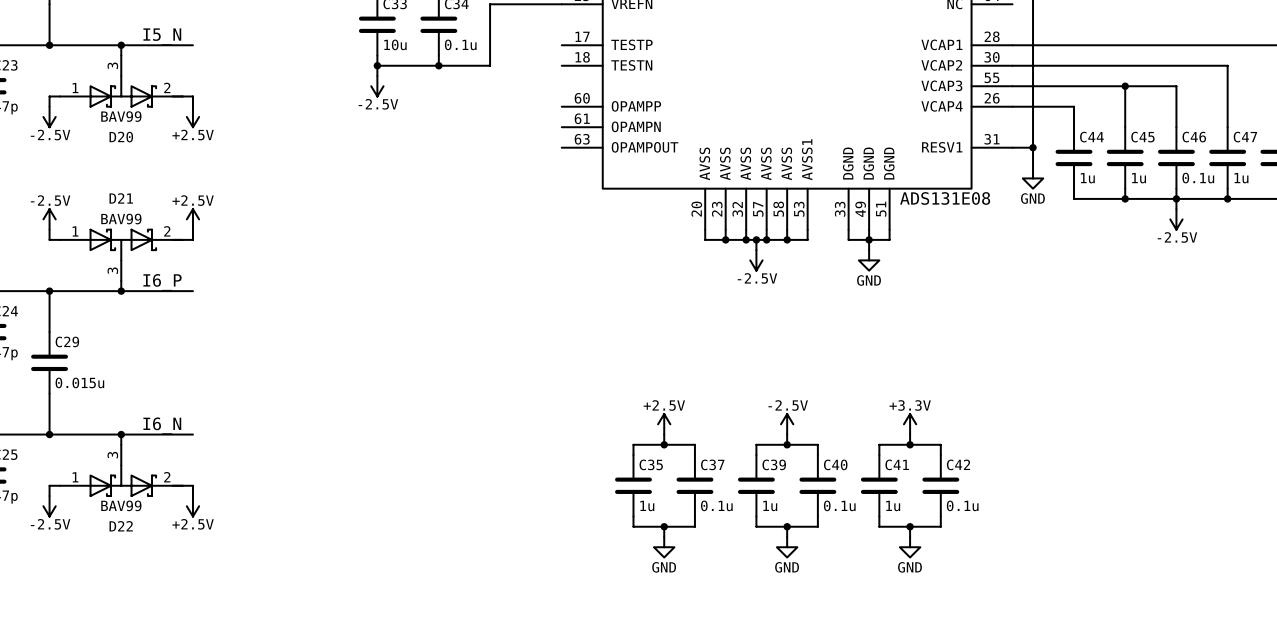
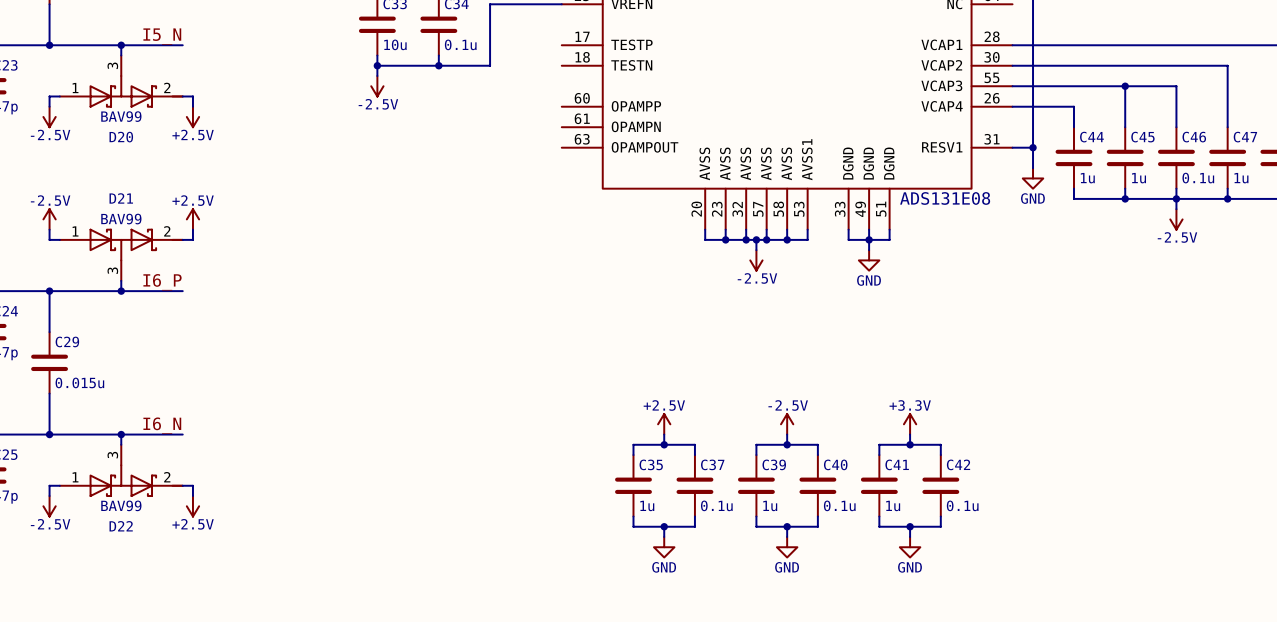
wire: (182, 45) (192, 45) -> none
wire: (182, 291) (192, 291) -> none
wire: (182, 434) (192, 434) -> none

